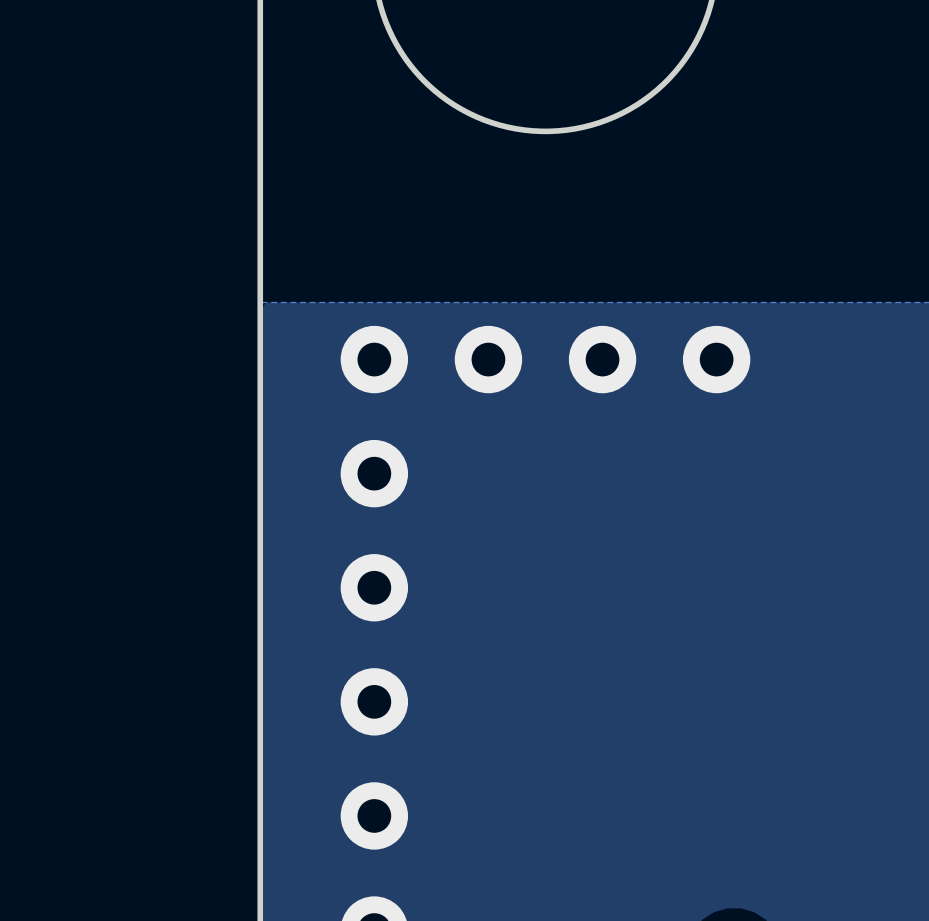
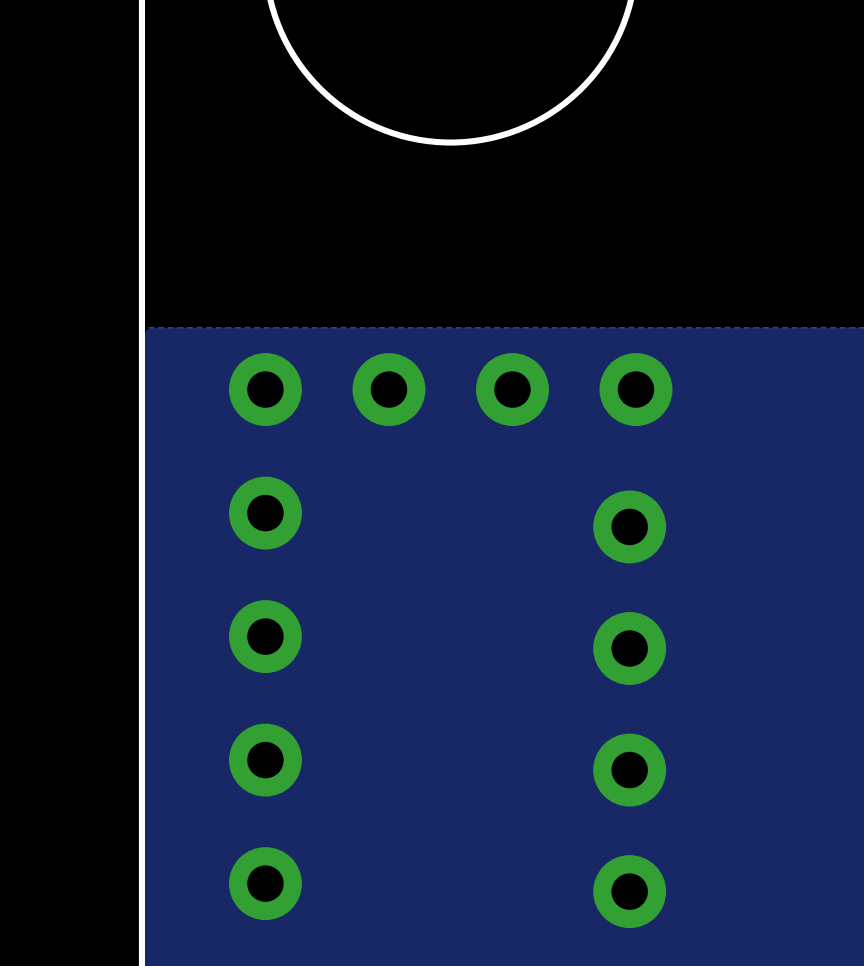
via: none -> (629, 526)
via: none -> (629, 648)
via: none -> (629, 770)
via: none -> (629, 891)

